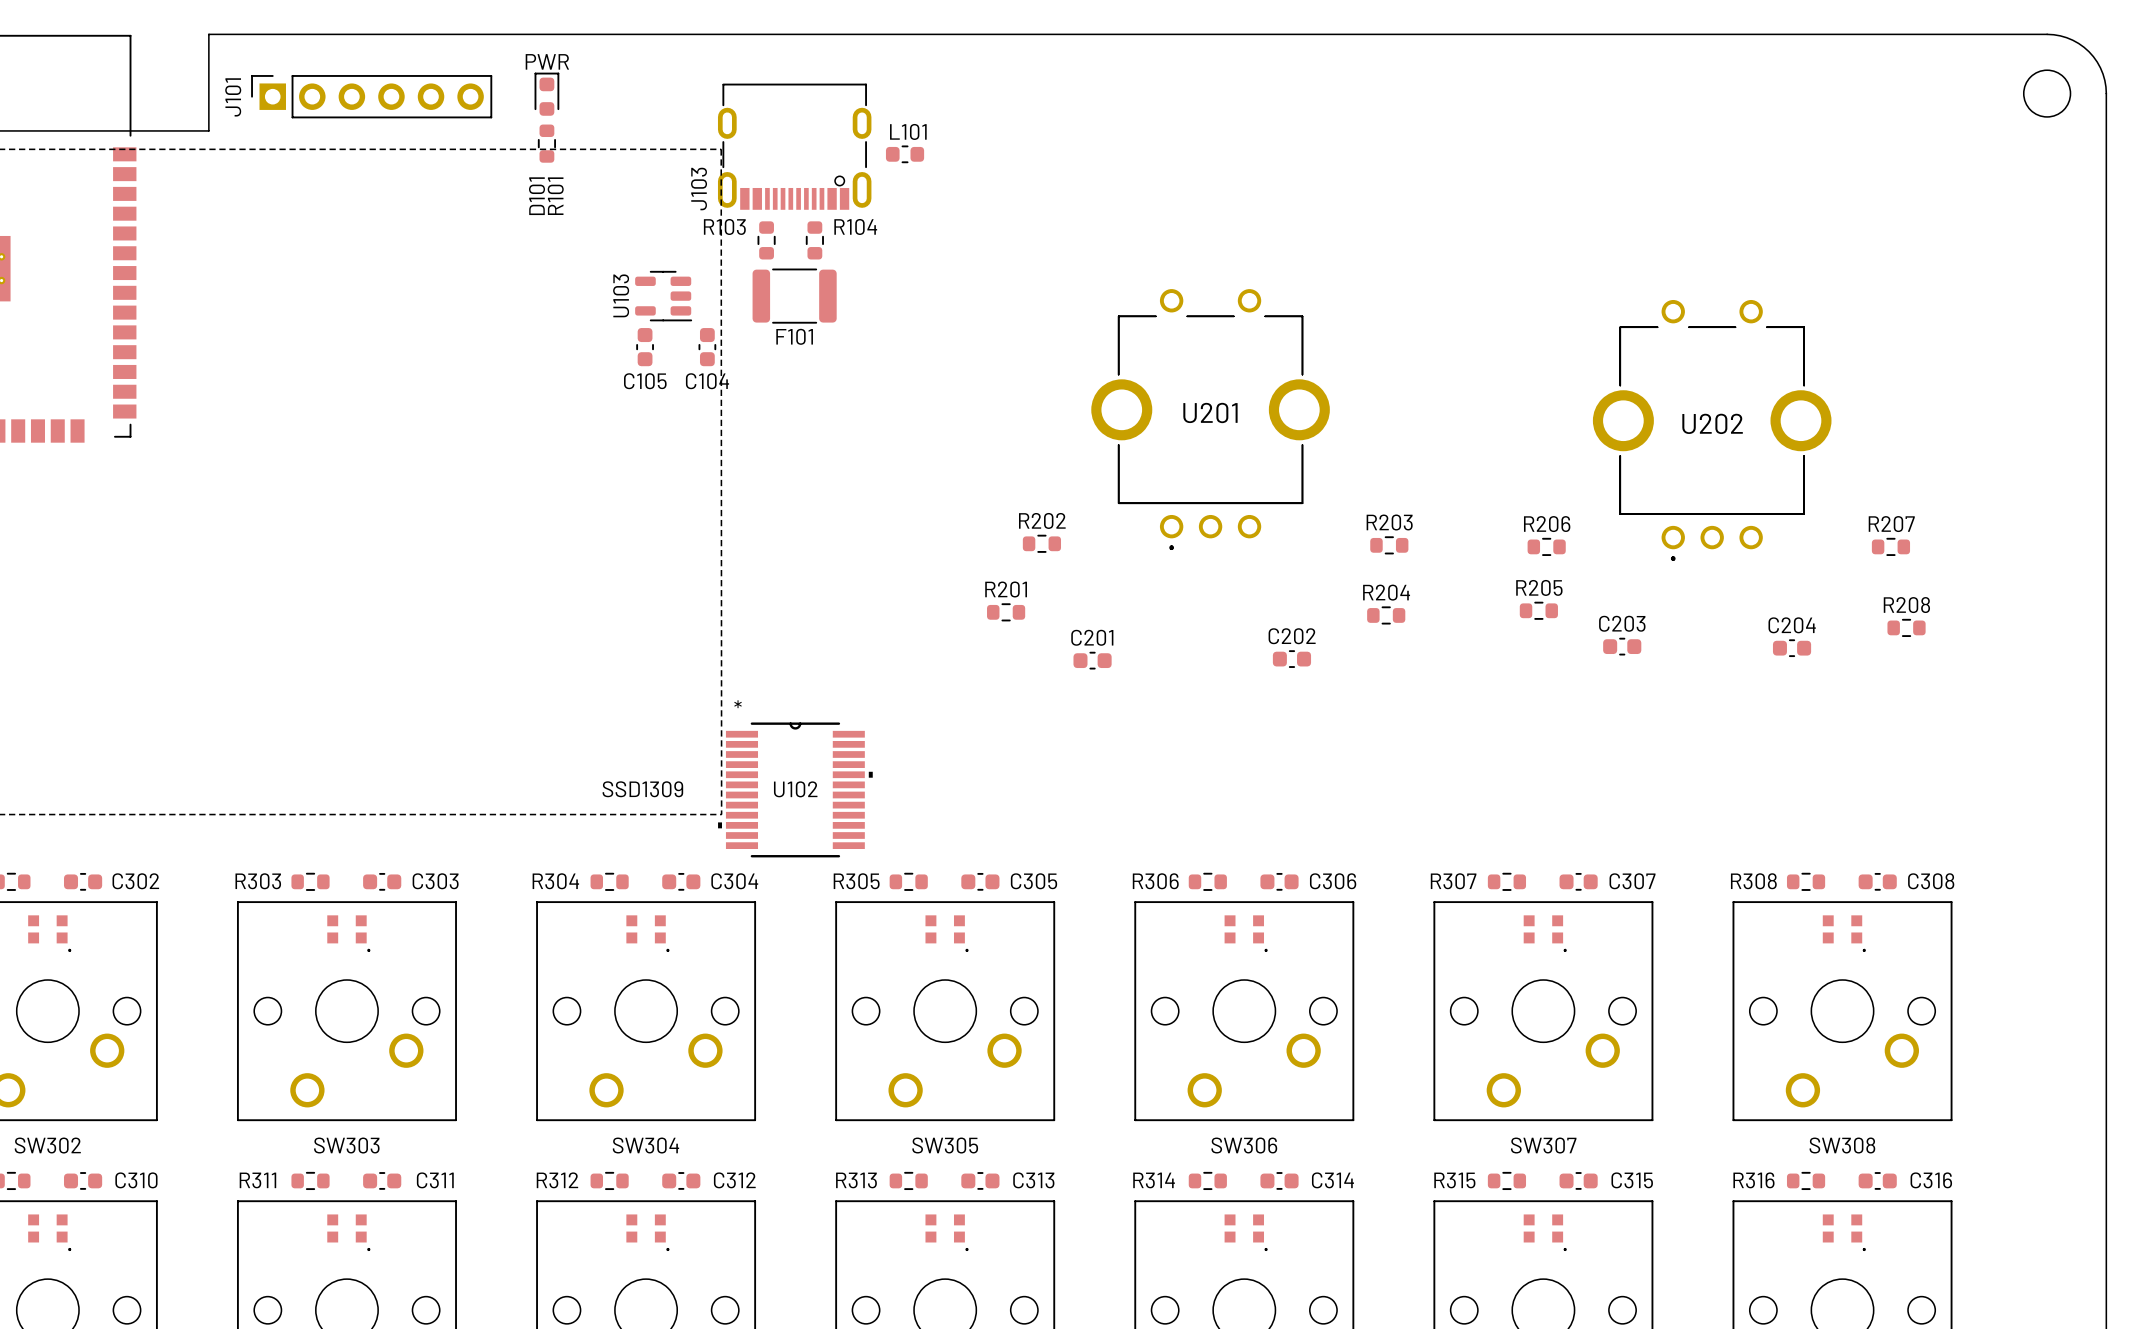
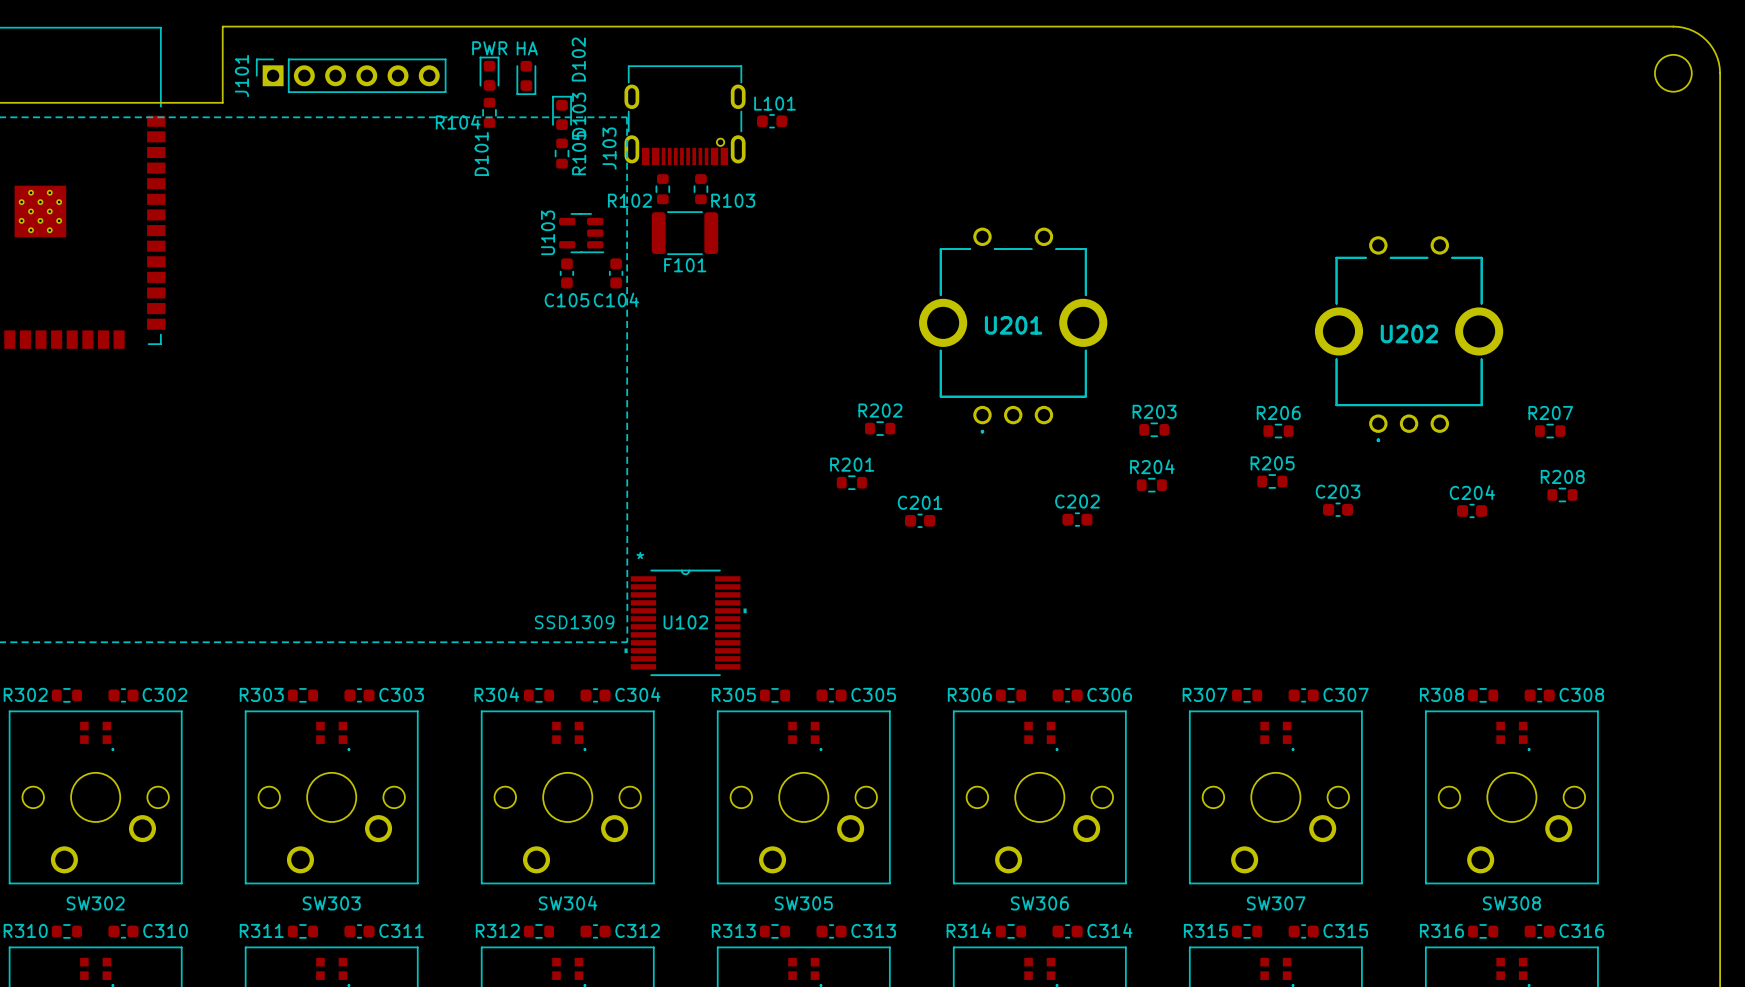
text: none -> HA (527, 48)
D102: none -> (526, 77)
D103: none -> (562, 112)
R105: none -> (562, 153)
R101 name: R101 (555, 196) -> R104 (458, 122)
R103 name: R103 (724, 226) -> R102 (629, 200)
R104 name: R104 (855, 226) -> R103 (733, 200)

